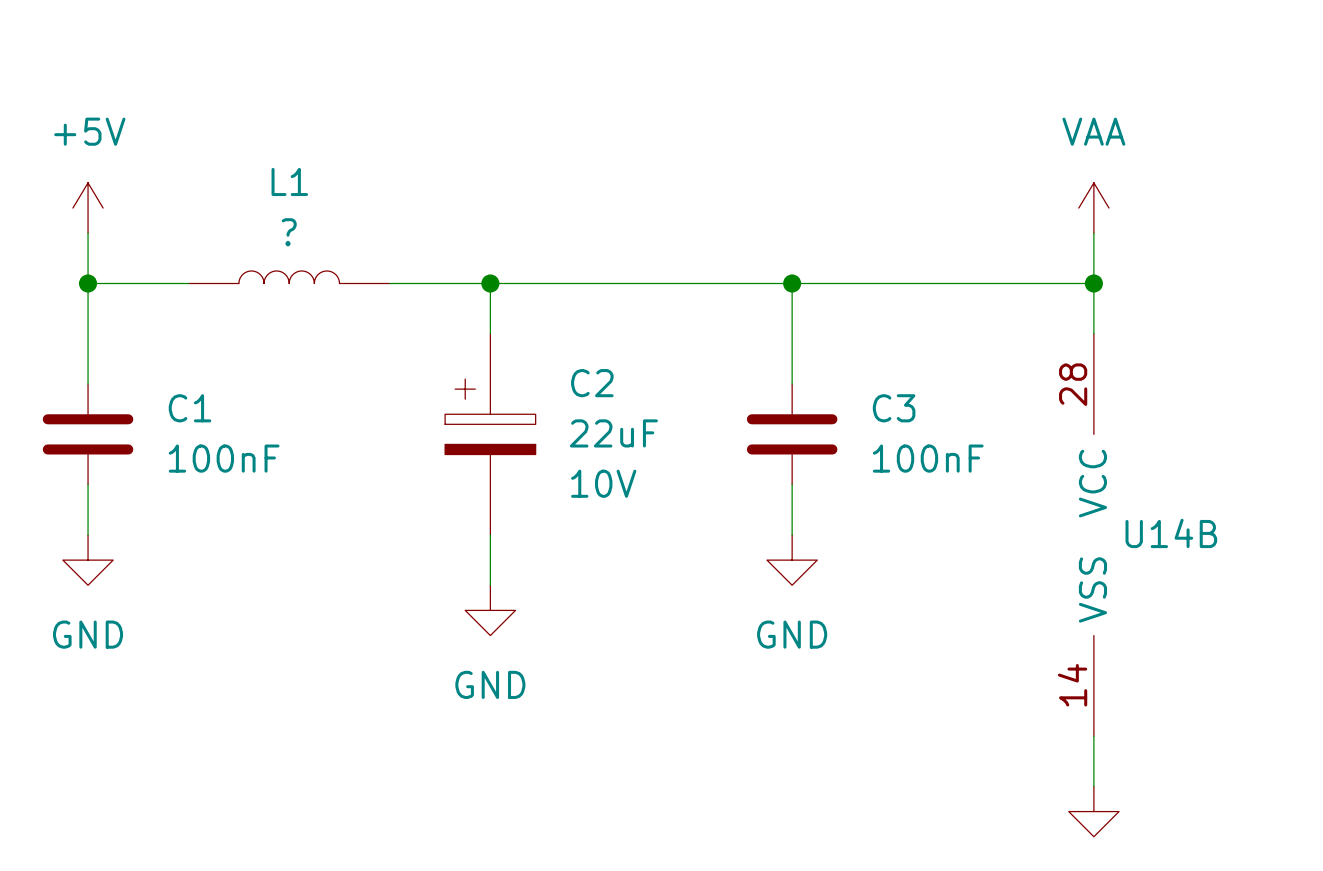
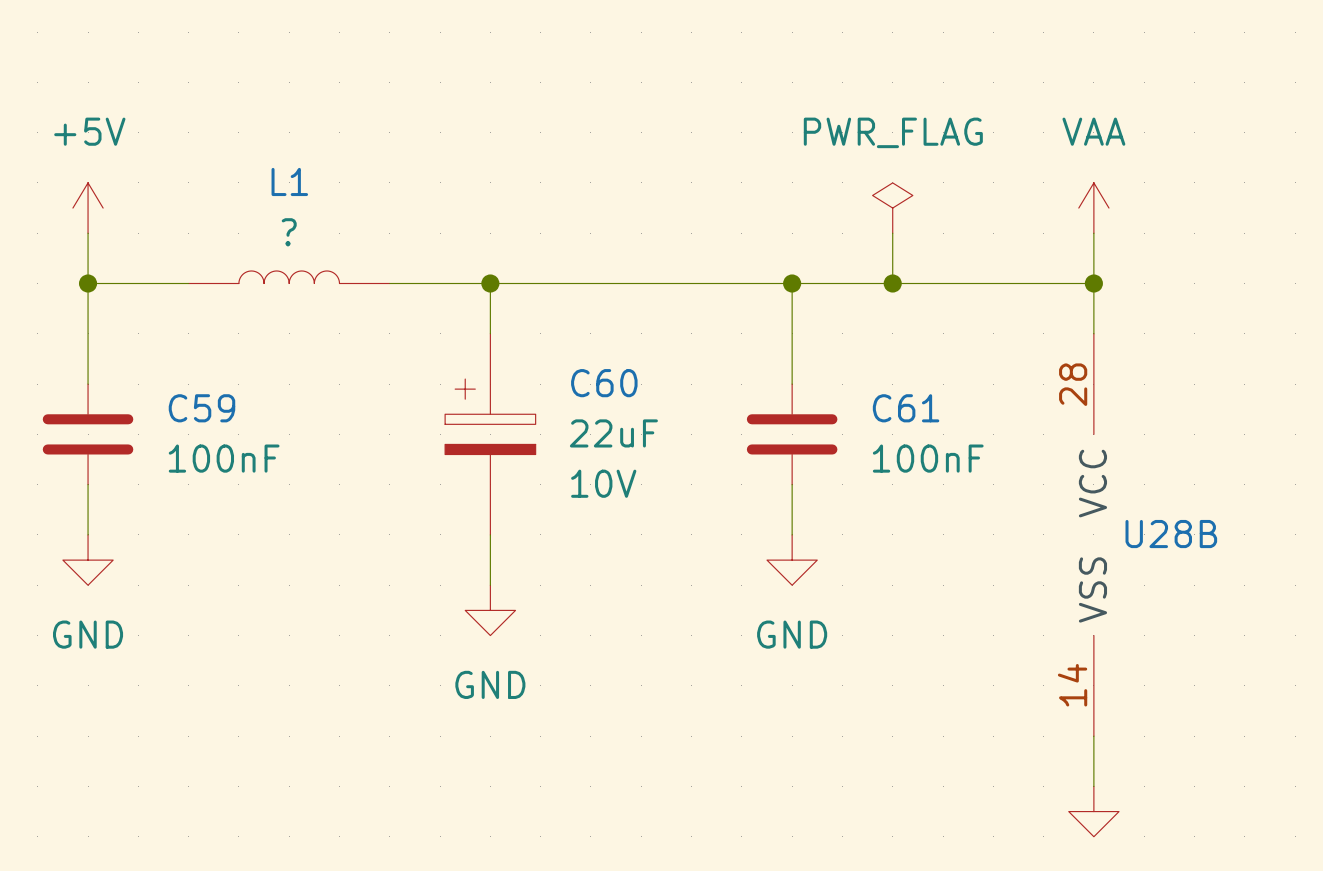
power symbol: none -> PWR_FLAG (892, 208)
wire: none -> (892, 233) (892, 283)
junction: none -> (892, 283)
C2 name: C2 (592, 383) -> C60 (604, 383)
C1 name: C1 (190, 408) -> C59 (201, 408)
C3 name: C3 (894, 408) -> C61 (906, 408)
U14B name: U14B (1171, 533) -> U28B (1171, 534)

